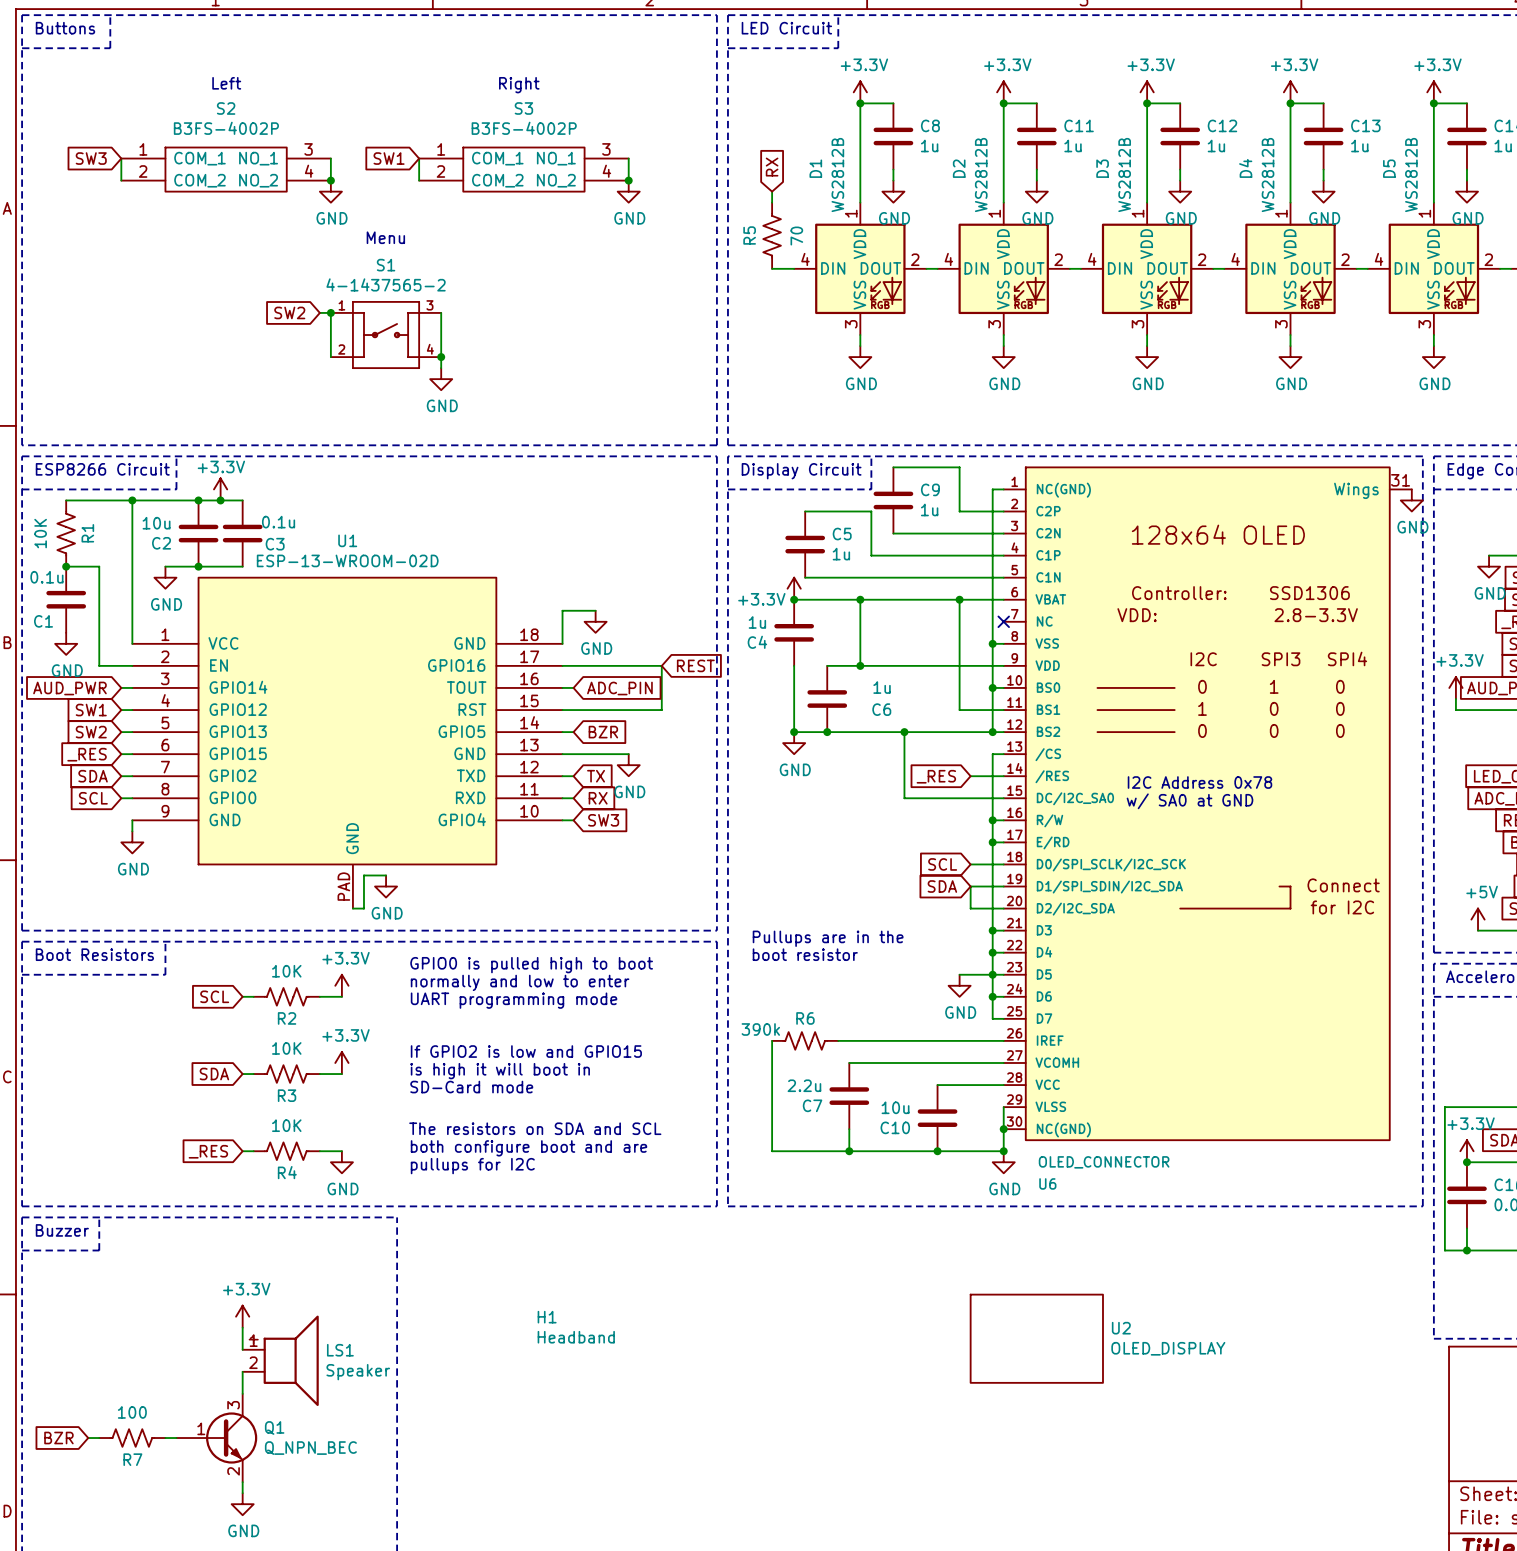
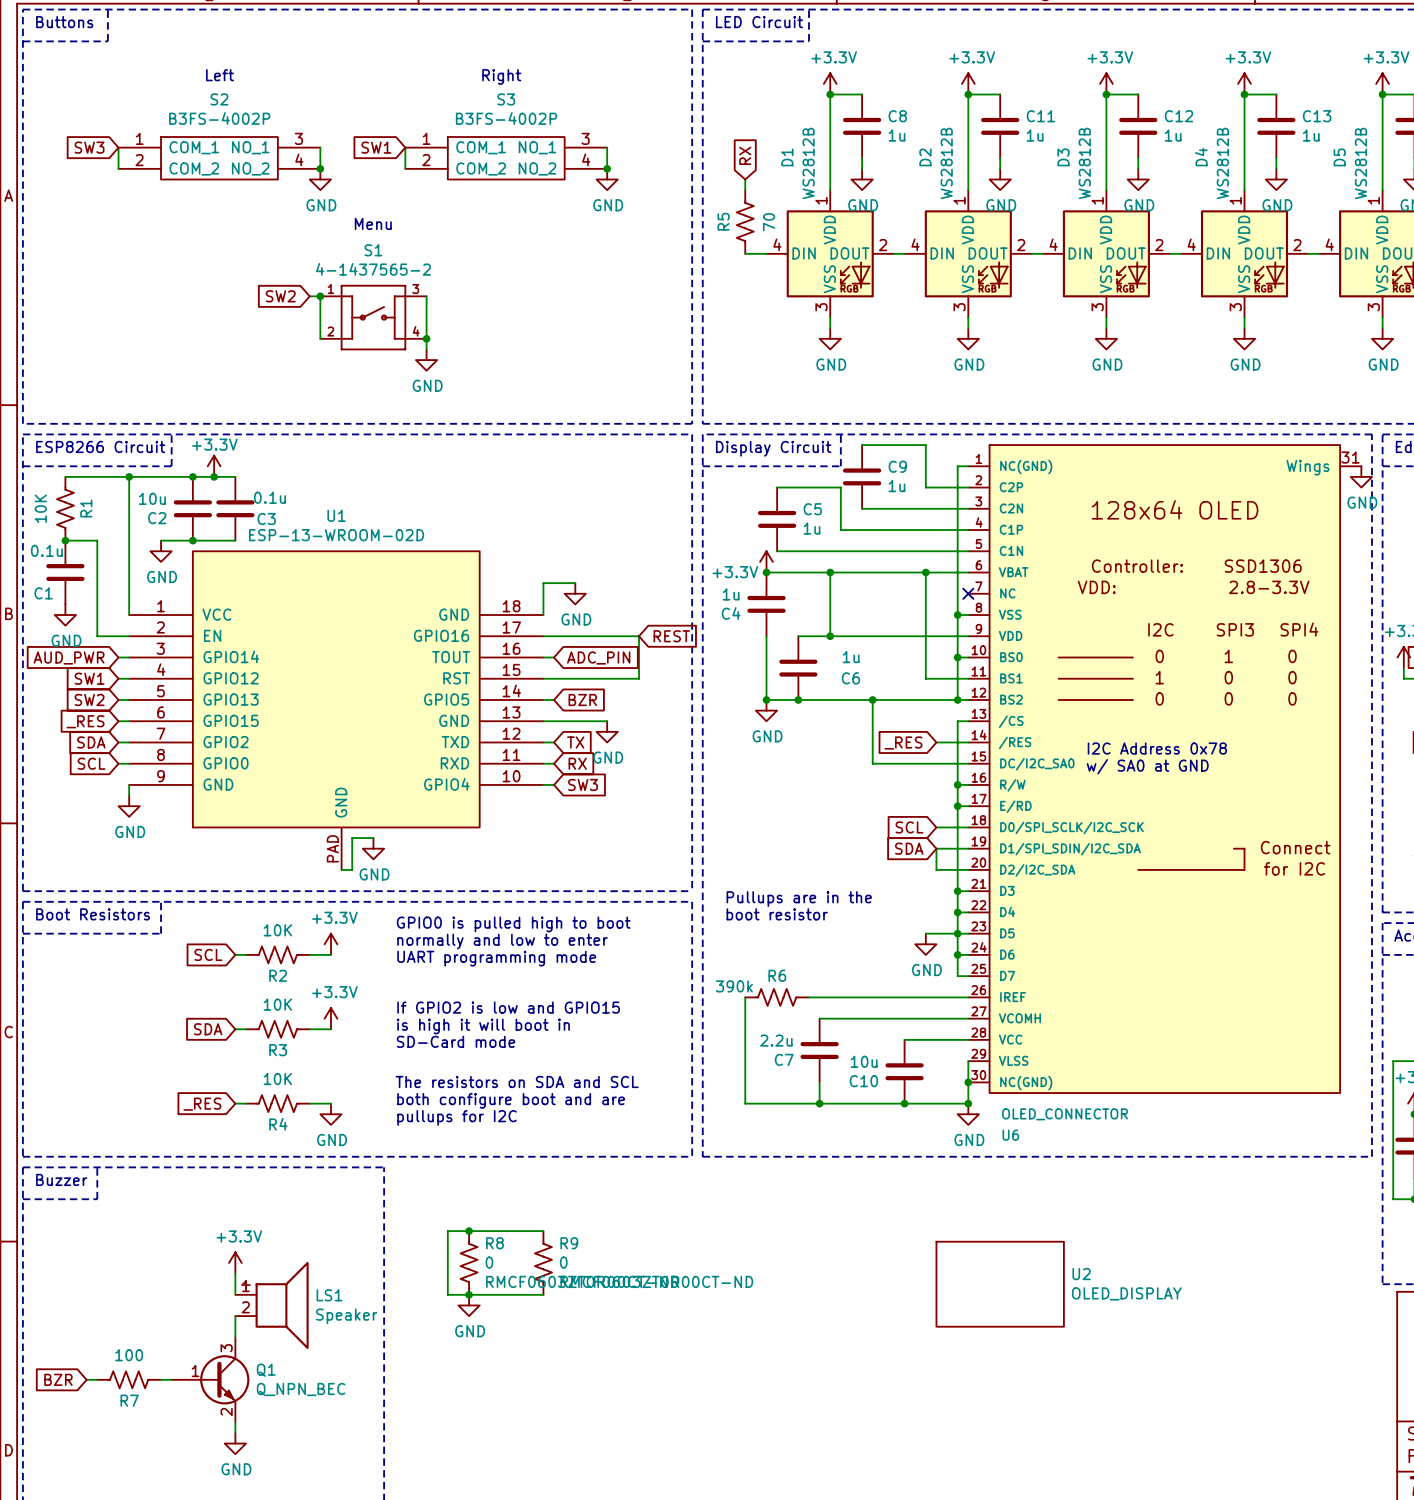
junction: none -> (469, 1231)
wire: none -> (543, 1231) (447, 1231) (447, 1294) (543, 1294)
R8: none -> 0 (469, 1262)
R9: none -> 0 (543, 1262)
H1: Headband (576, 1327) -> none
junction: none -> (469, 1294)
power symbol: none -> GND (469, 1305)

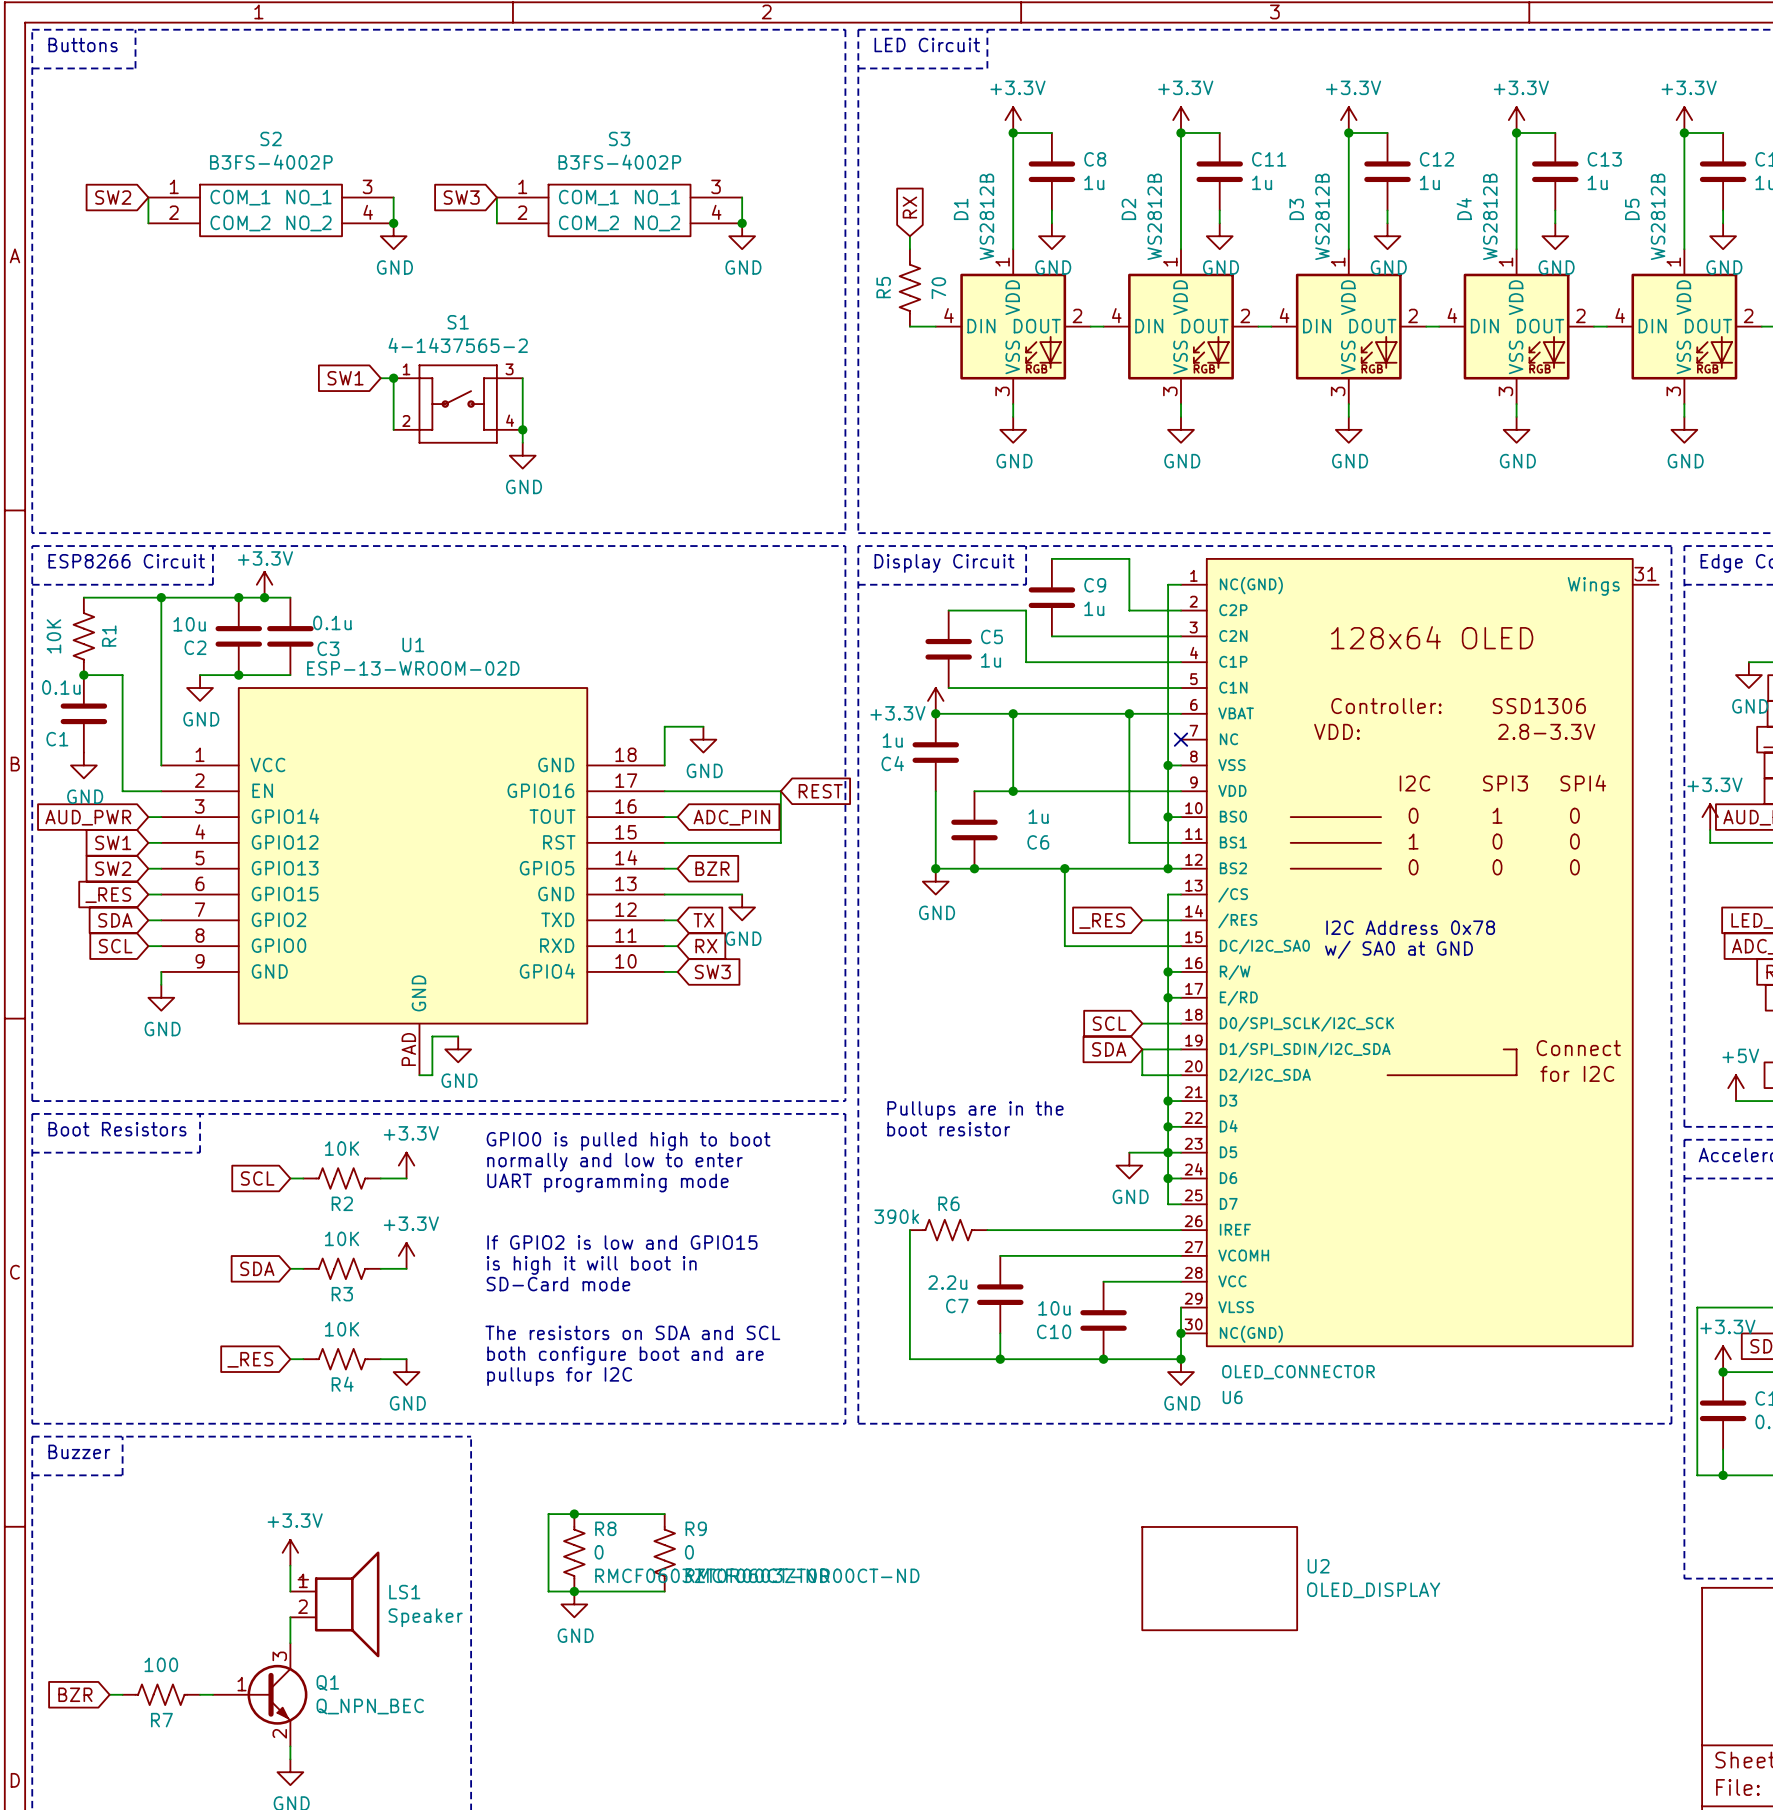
text: Left (220, 75) -> none
text: Right (501, 76) -> none
global label: SW3 (89, 147) -> SW2 (113, 197)
global label: SW1 (376, 147) -> SW3 (461, 197)
text: Menu (373, 223) -> none
global label: SW2 (280, 296) -> SW1 (345, 378)
power symbol: GND (1361, 476) -> none

